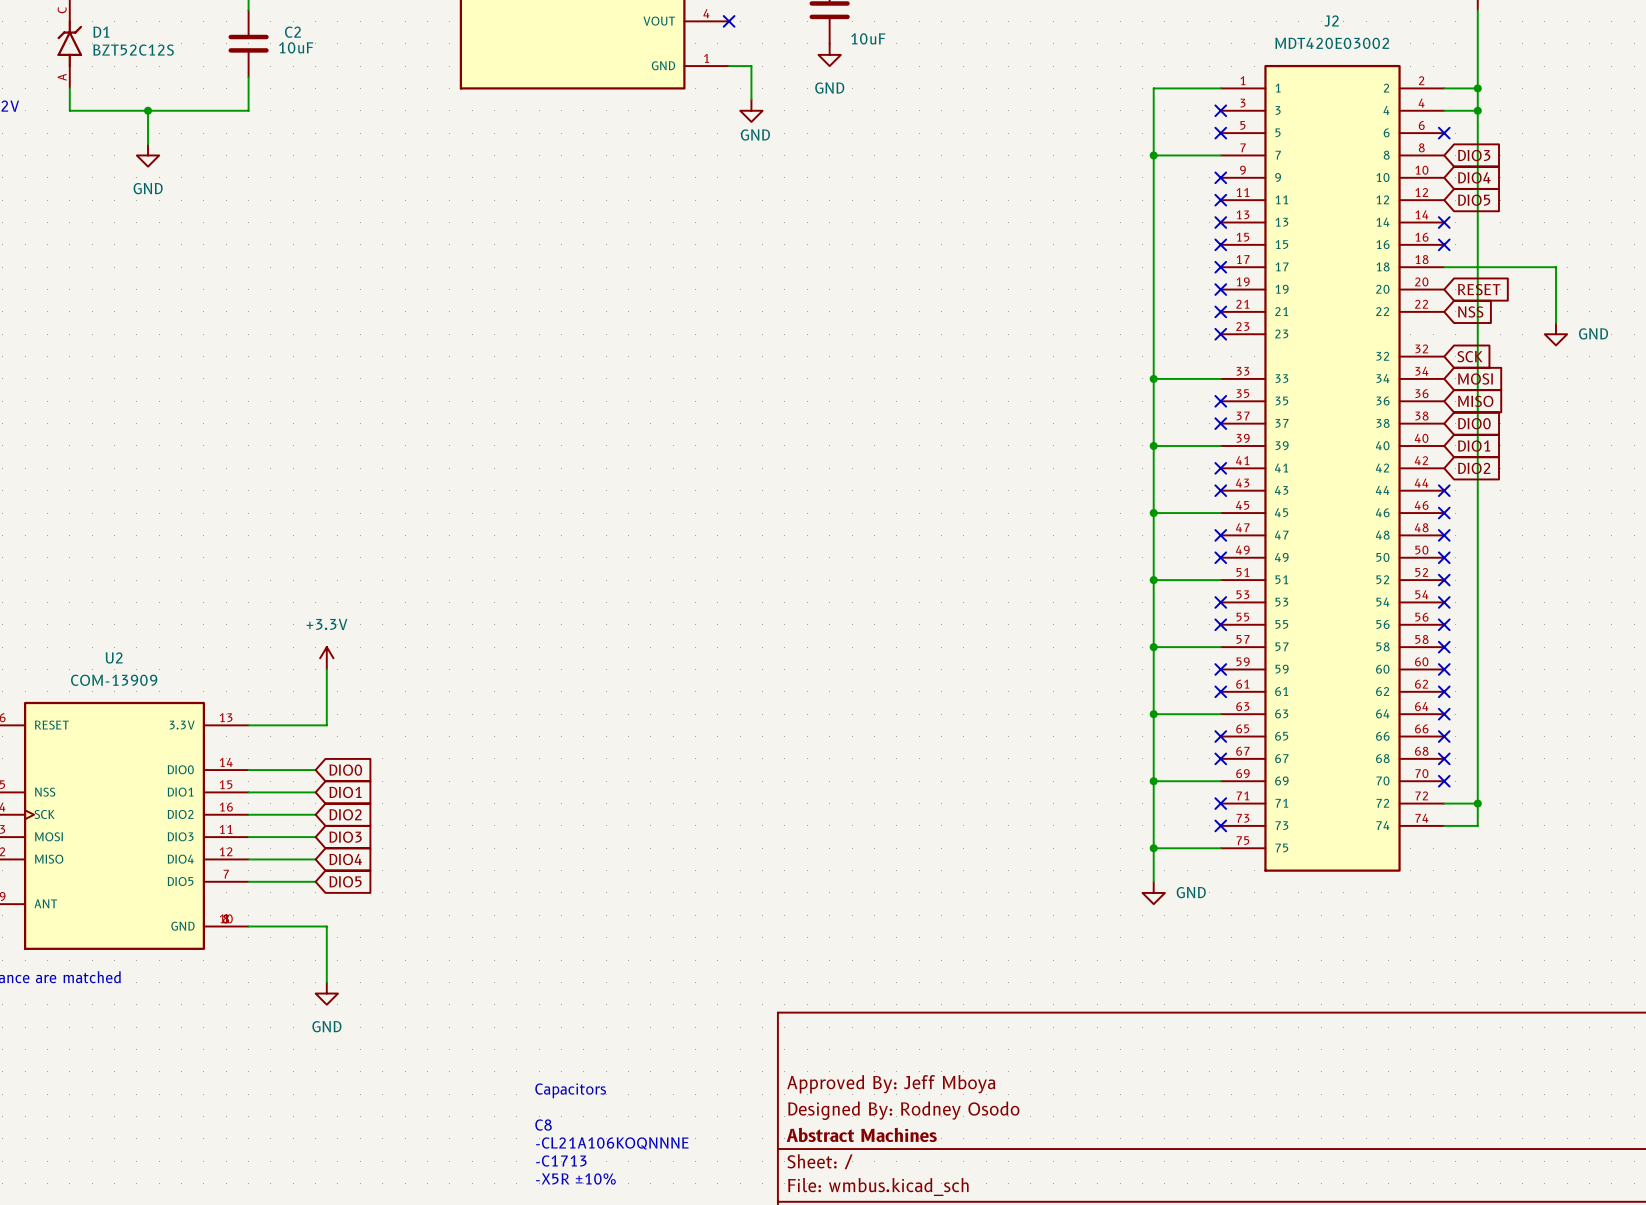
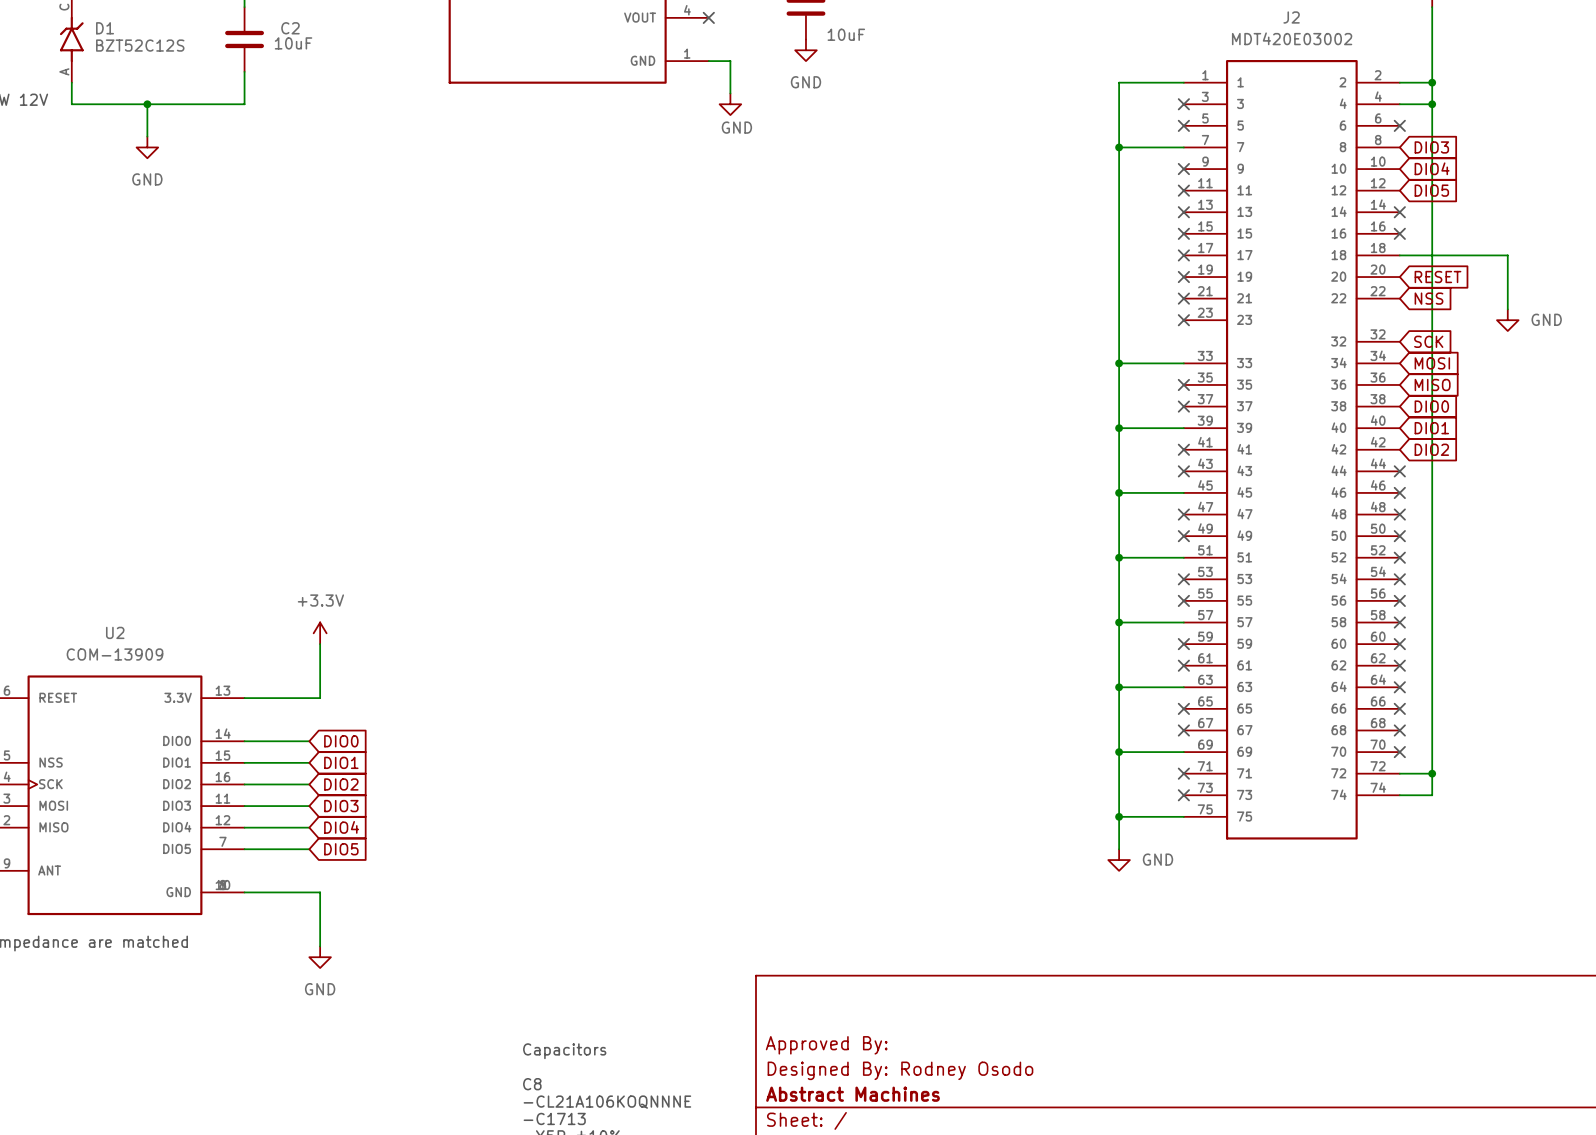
title block: Approved By: Jeff Mboya (891, 1084) -> Approved By: (826, 1045)

